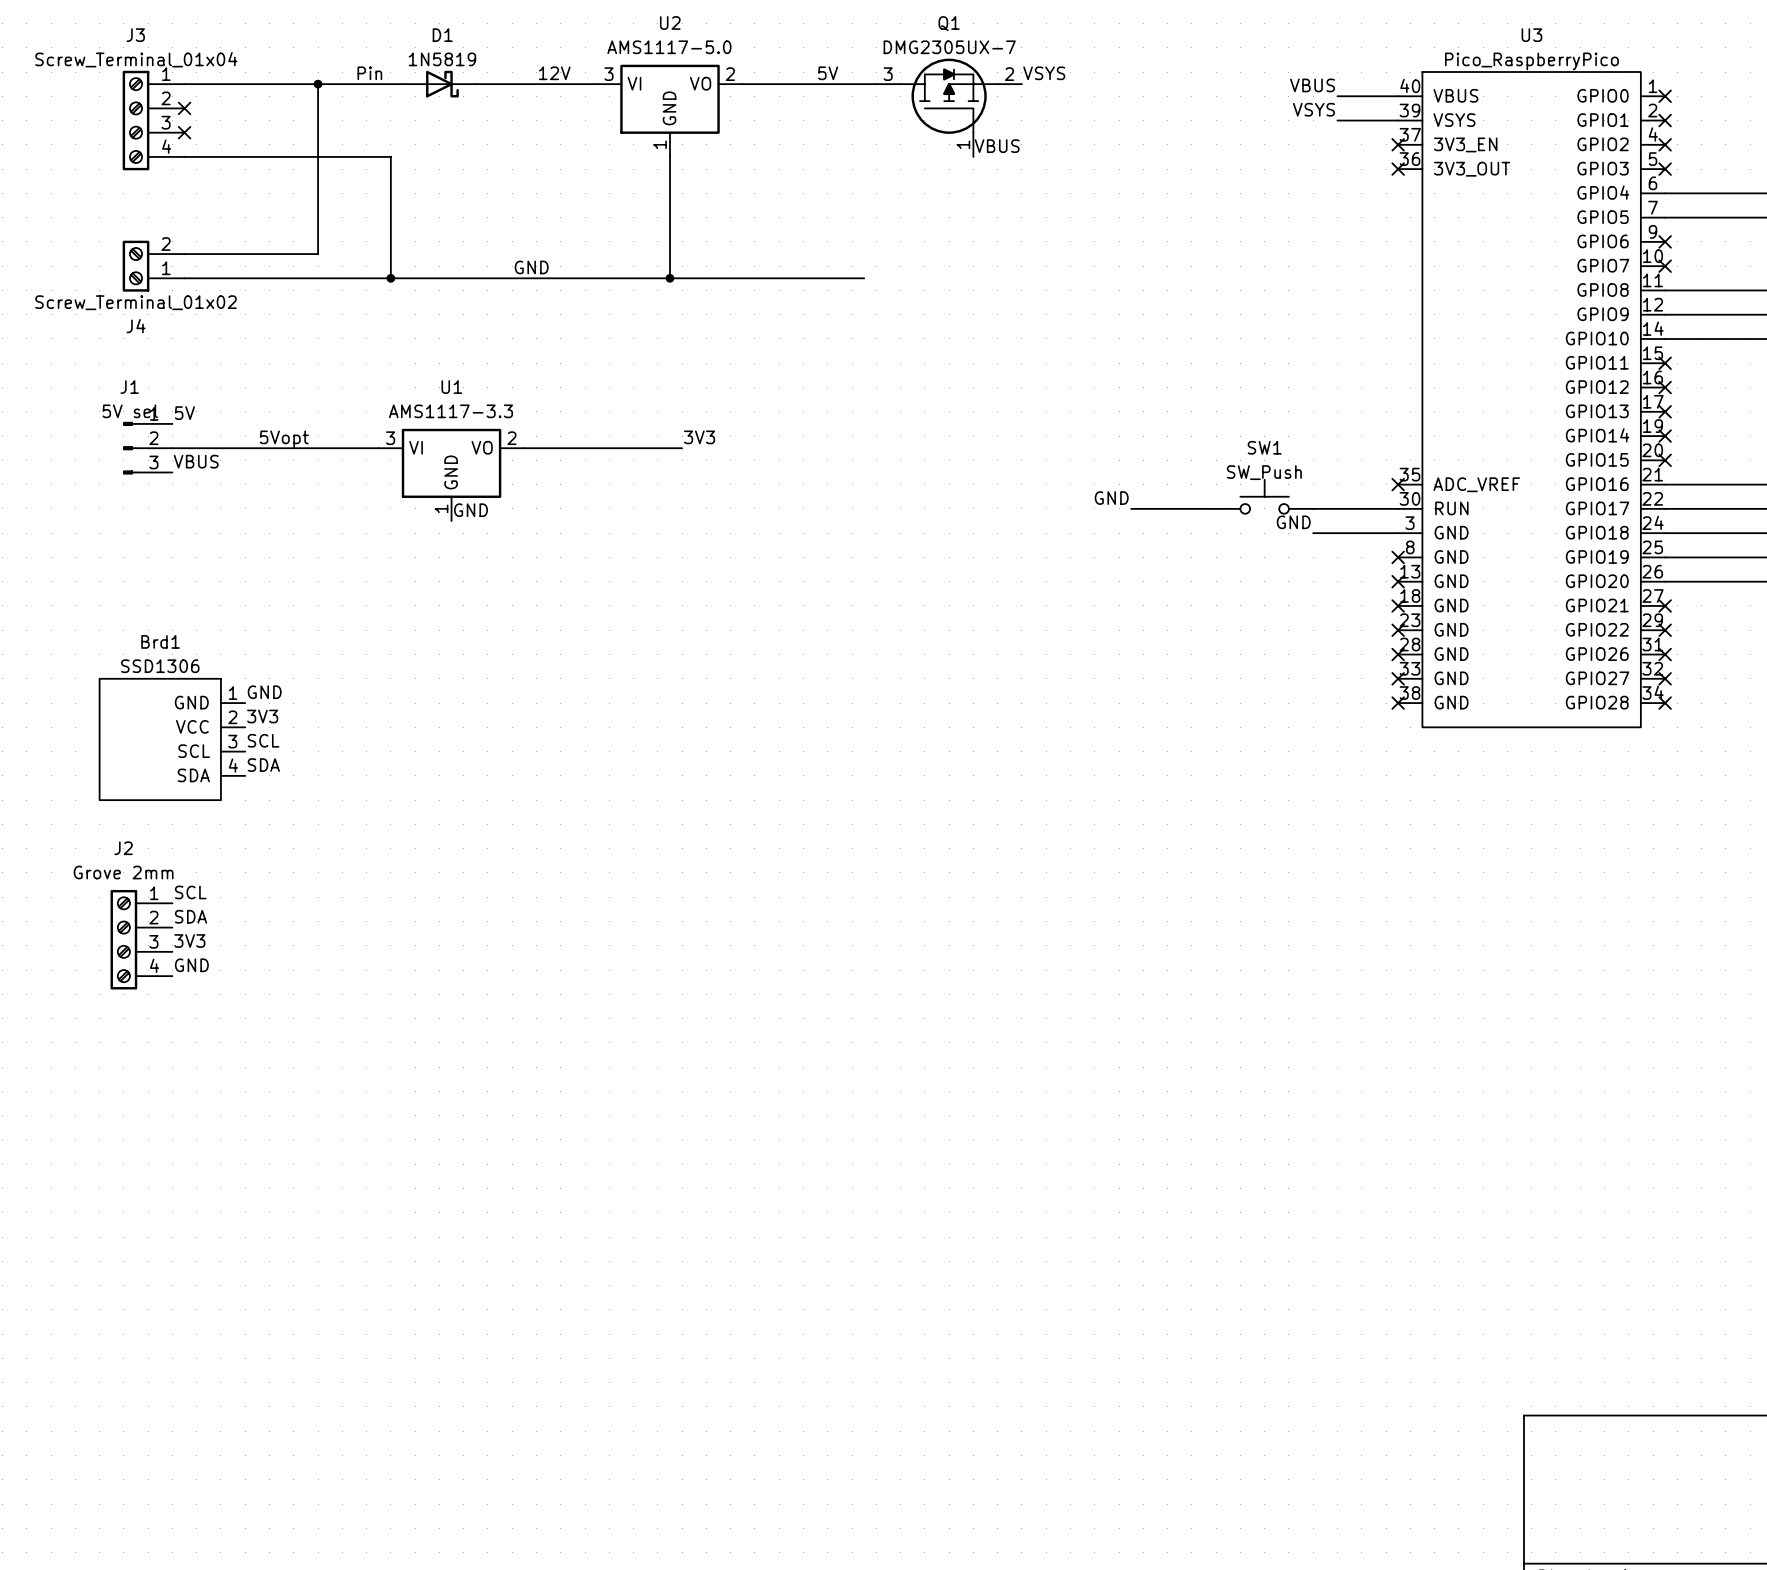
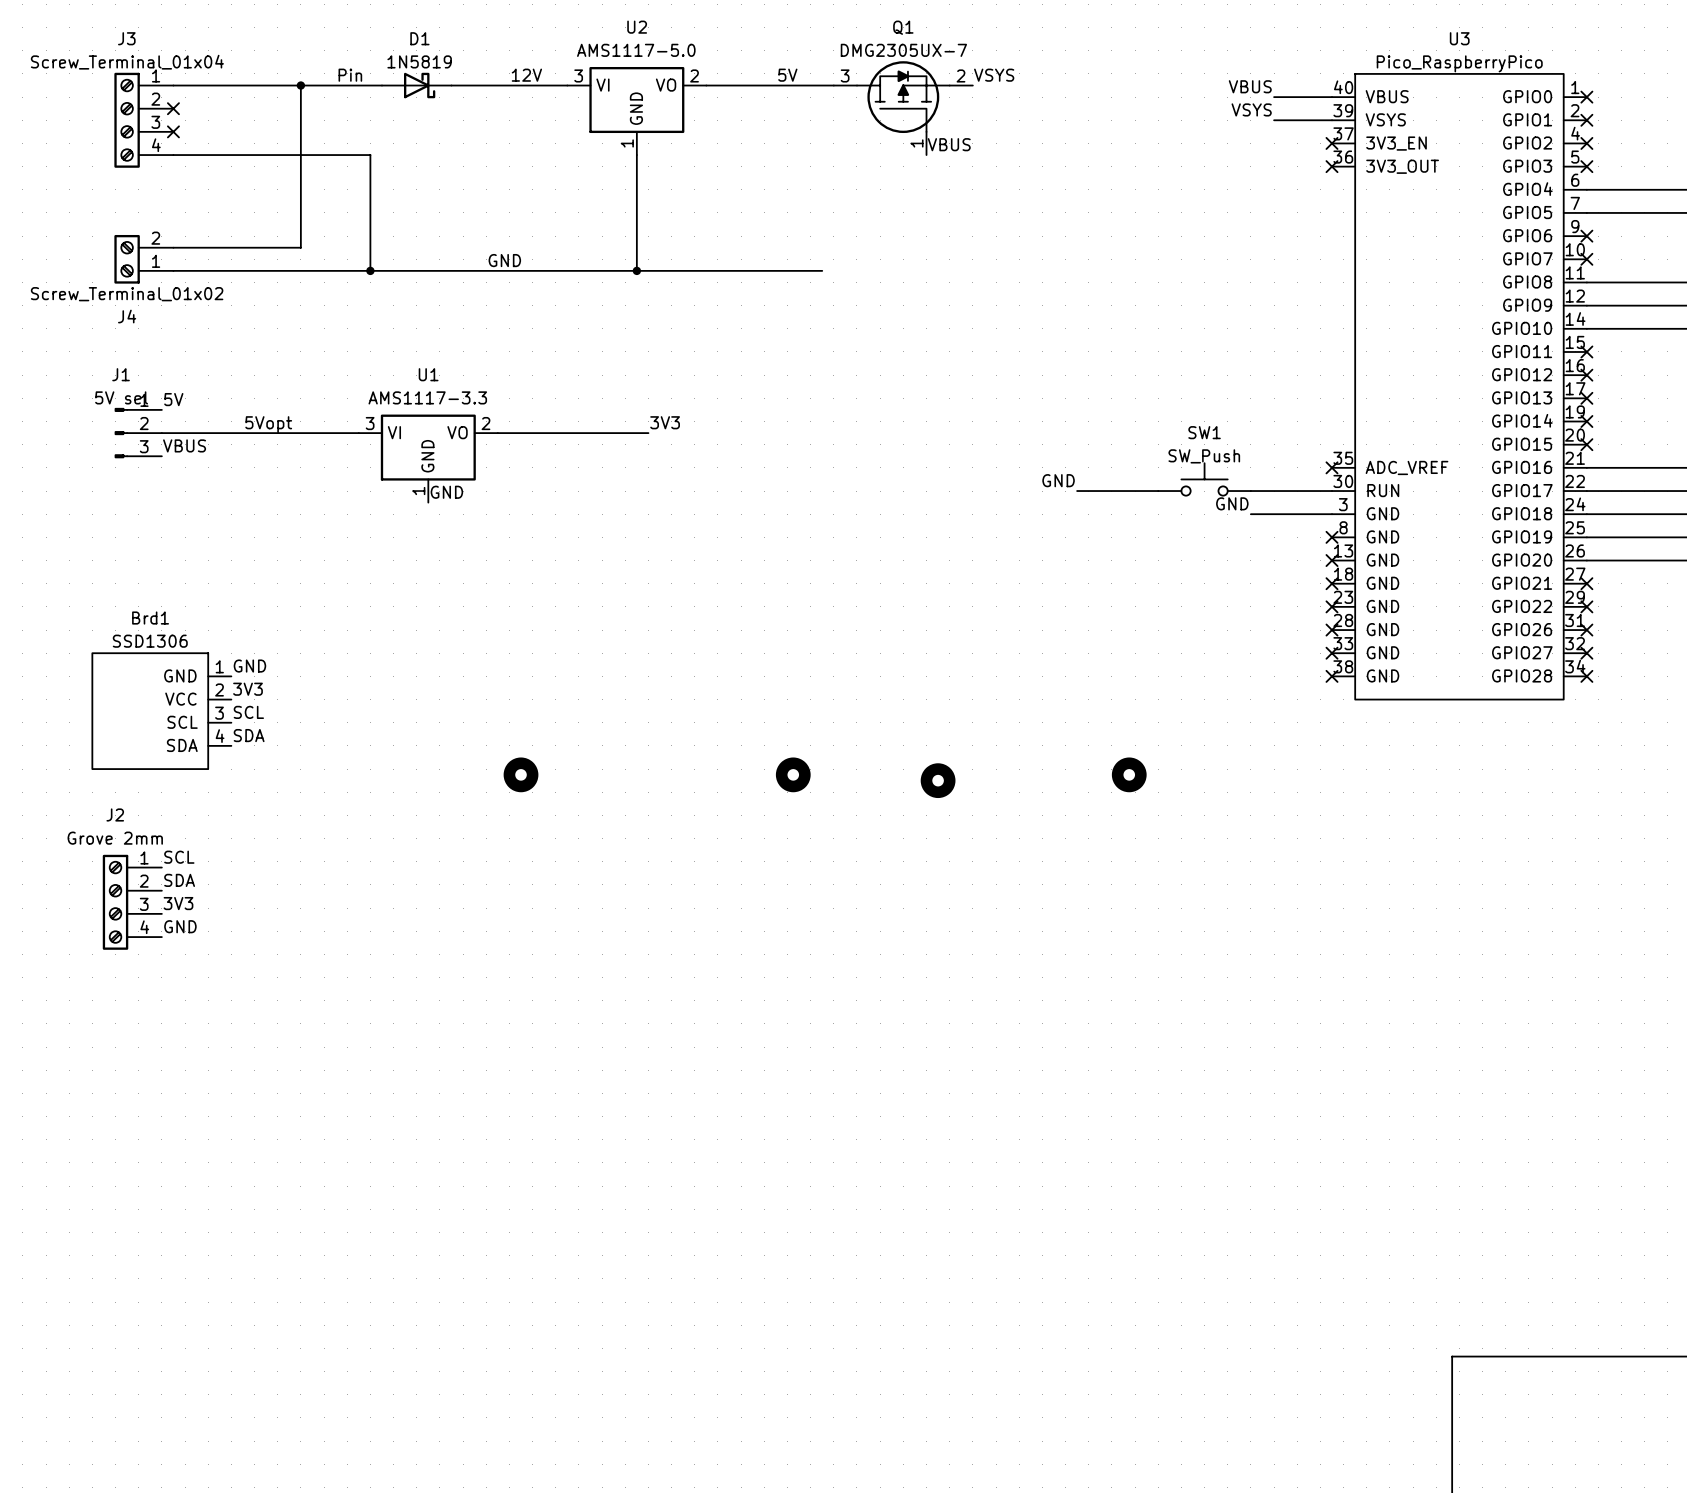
part: none -> (521, 774)
part: none -> (793, 774)
part: none -> (1129, 774)
part: none -> (938, 780)

